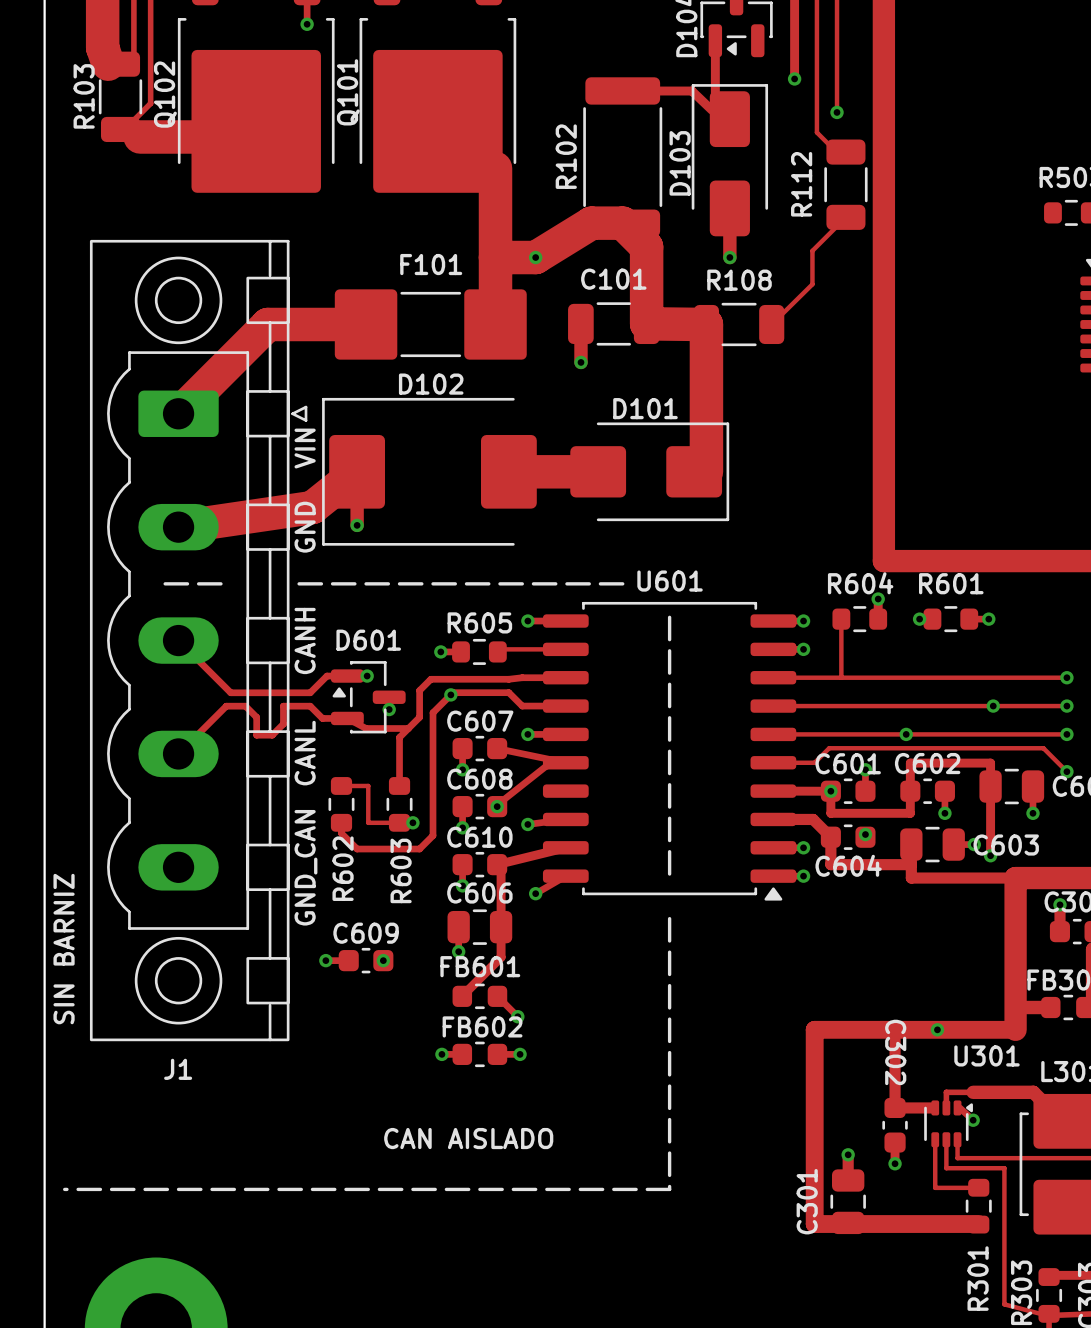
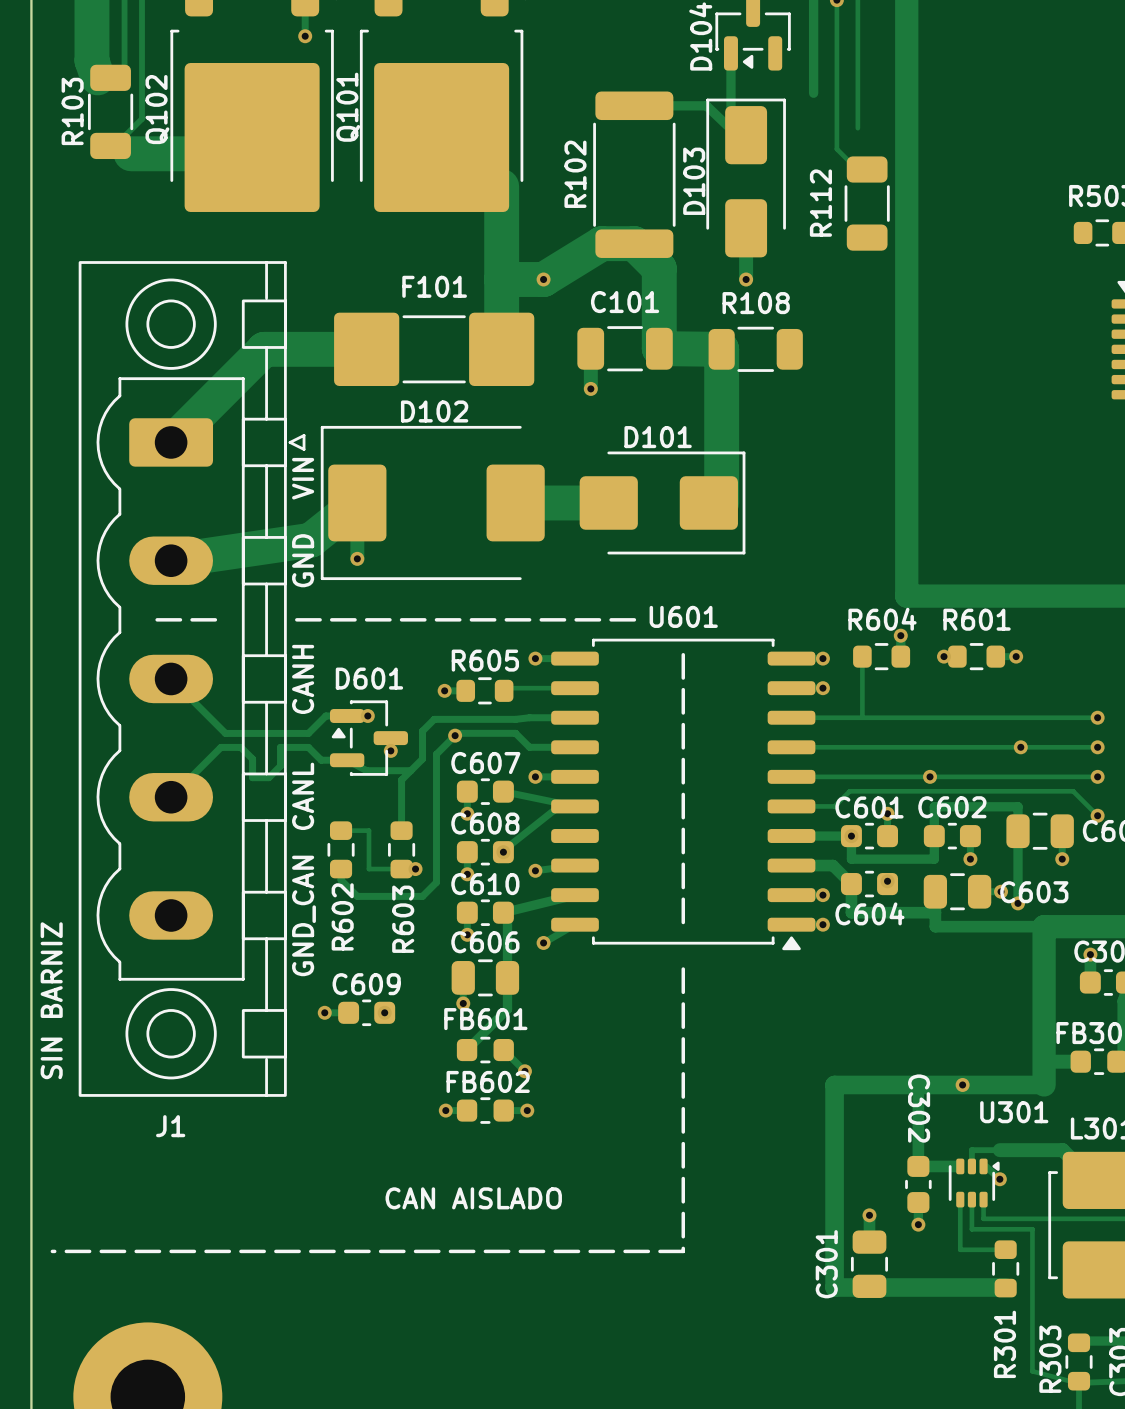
via: (794, 78) -> none
via: (837, 112) -> none
track: (845, 217) (812, 250) (812, 284) (771, 324) -> none

